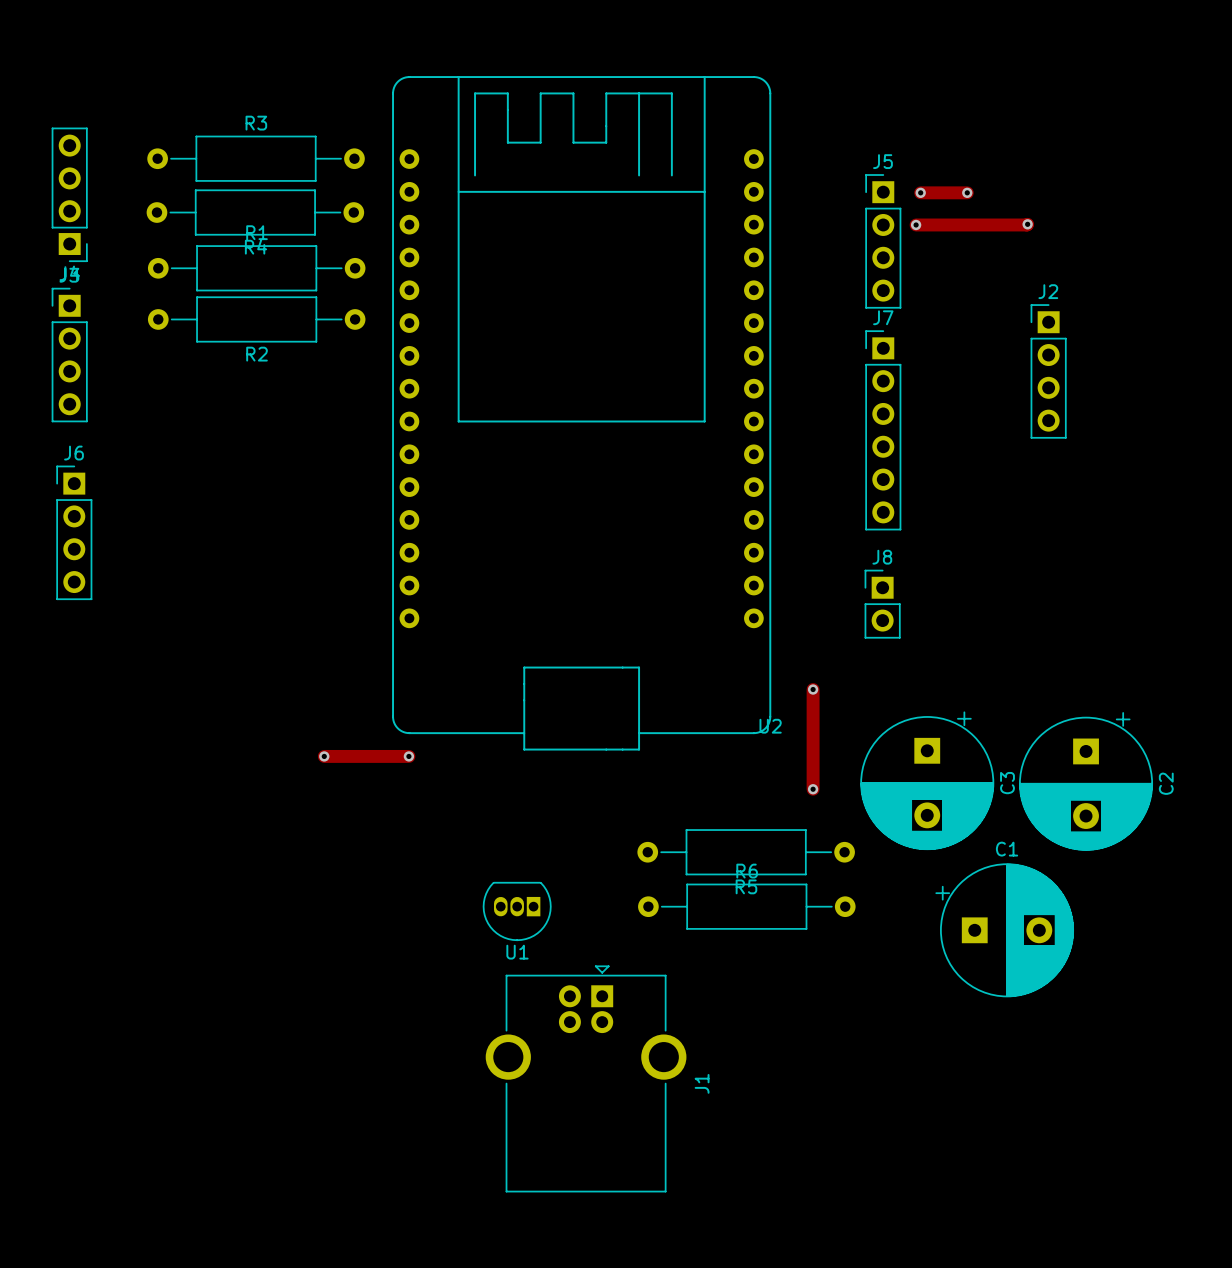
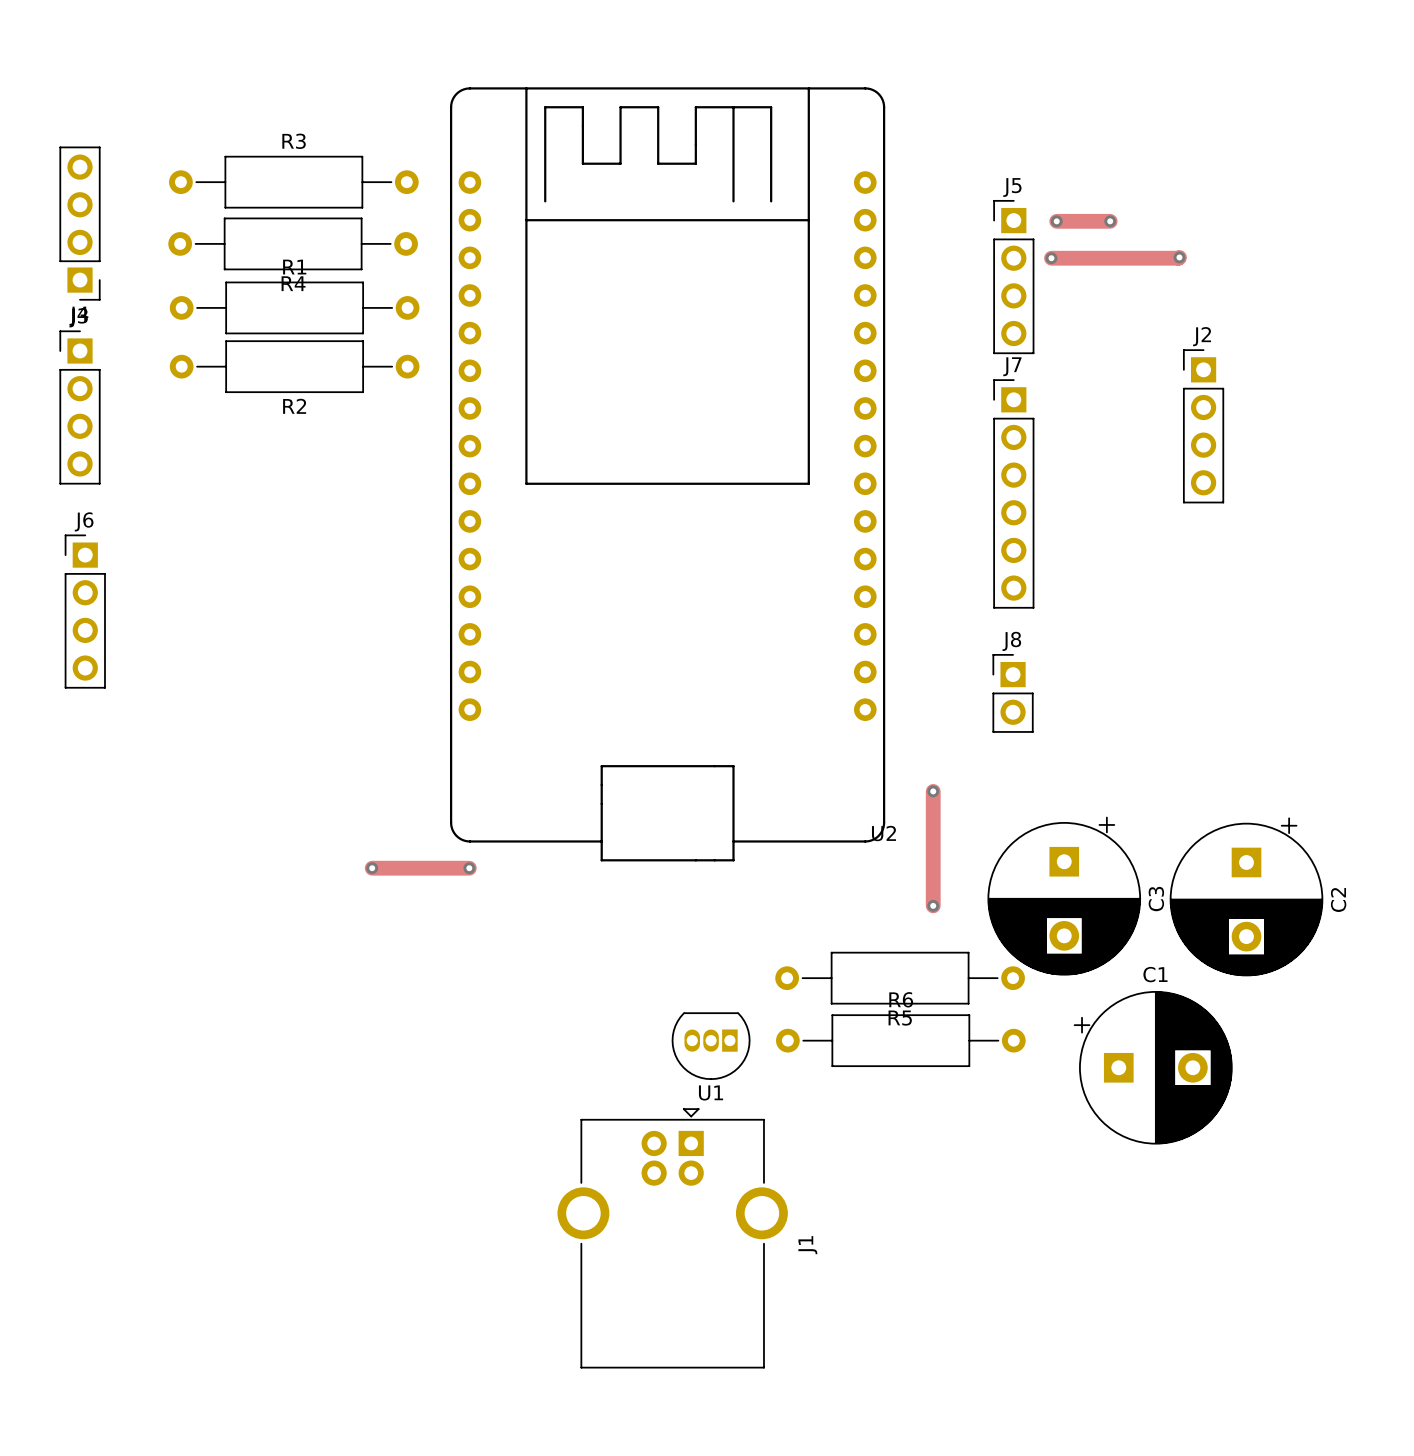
R5 position: (746, 852) -> (900, 978)
R6 position: (746, 906) -> (900, 1040)
U1 position: (517, 911) -> (711, 1046)

